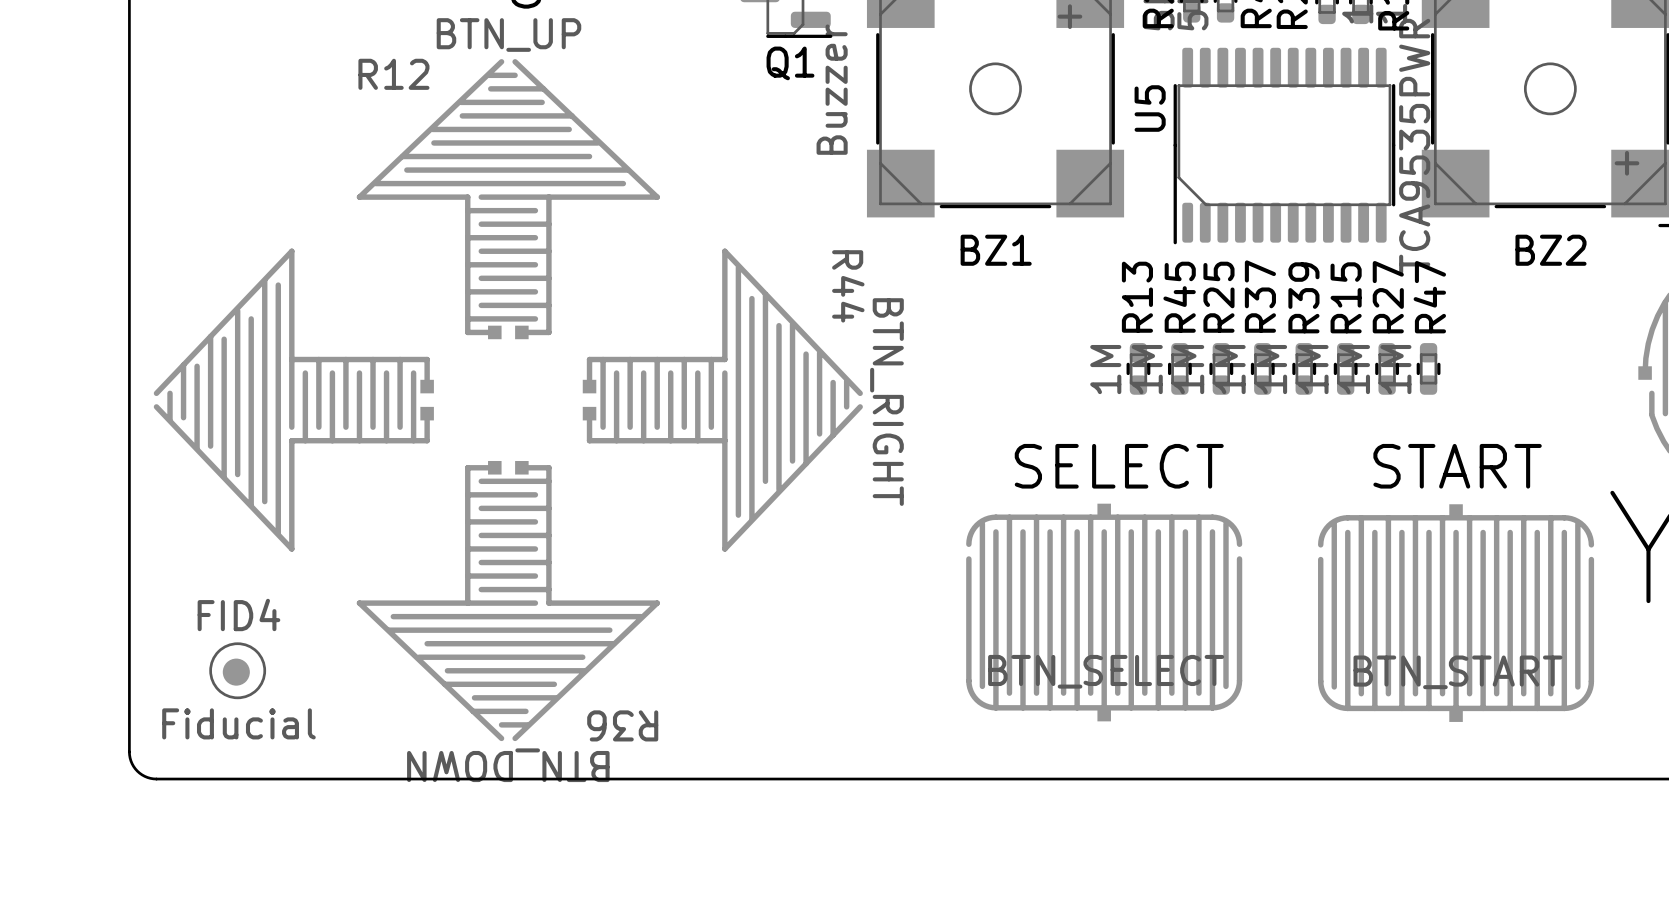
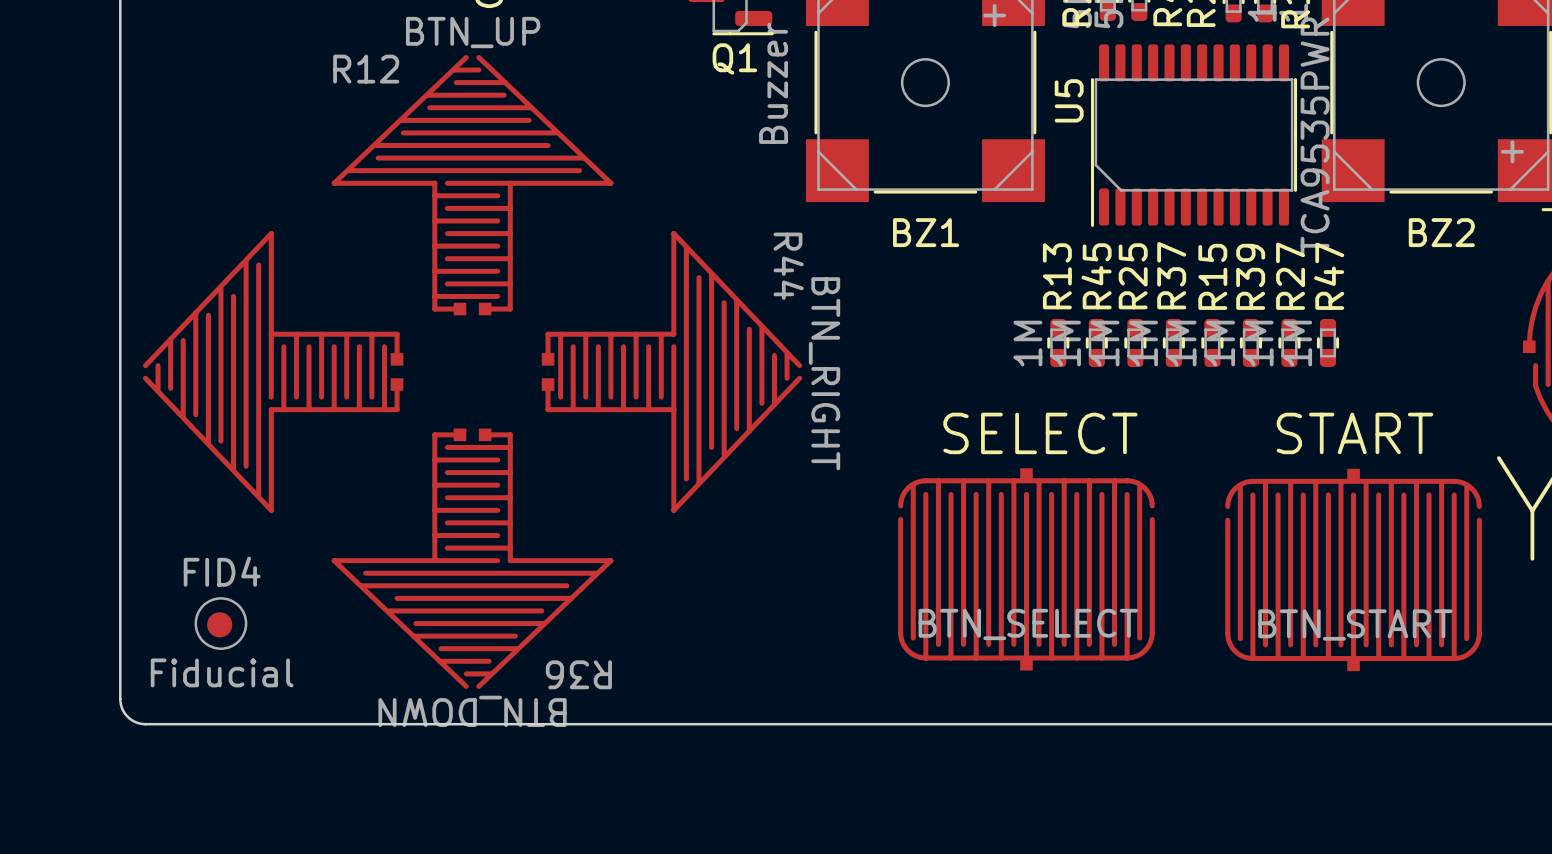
R39 name: R39 (1303, 297) -> R15 (1212, 276)
R15 name: R15 (1346, 297) -> R39 (1250, 276)

